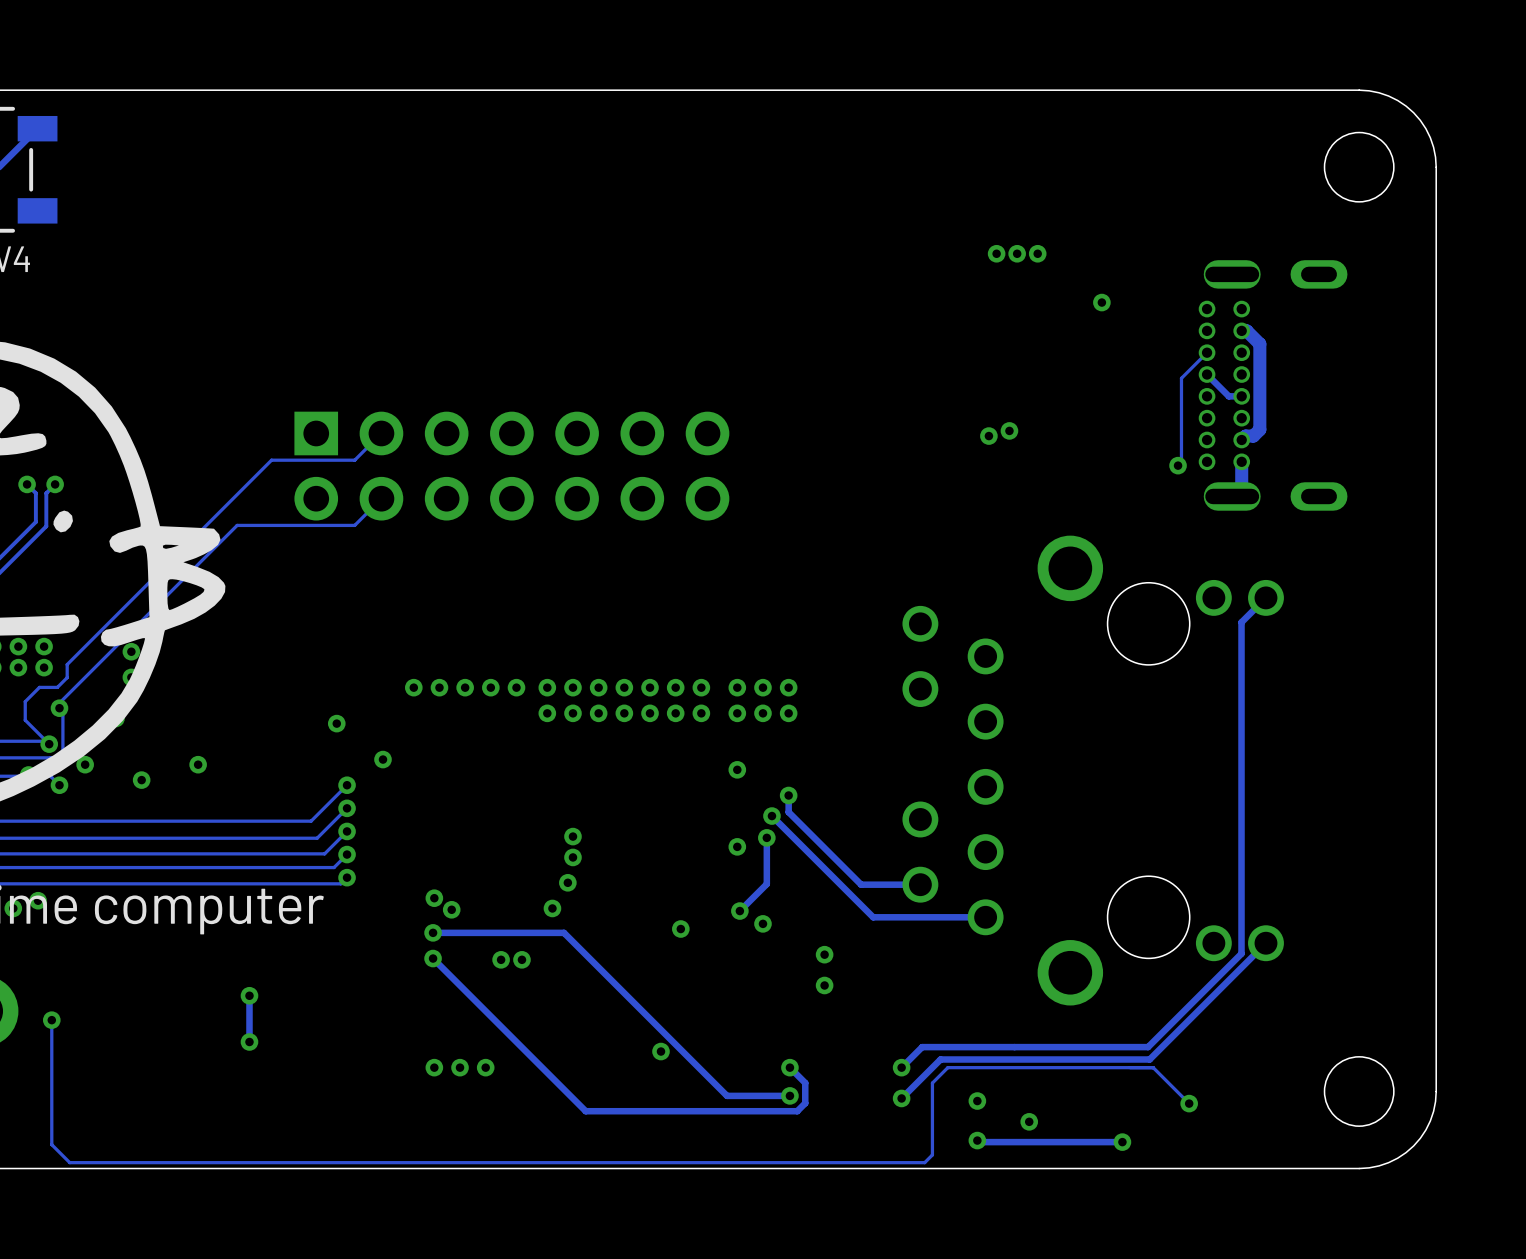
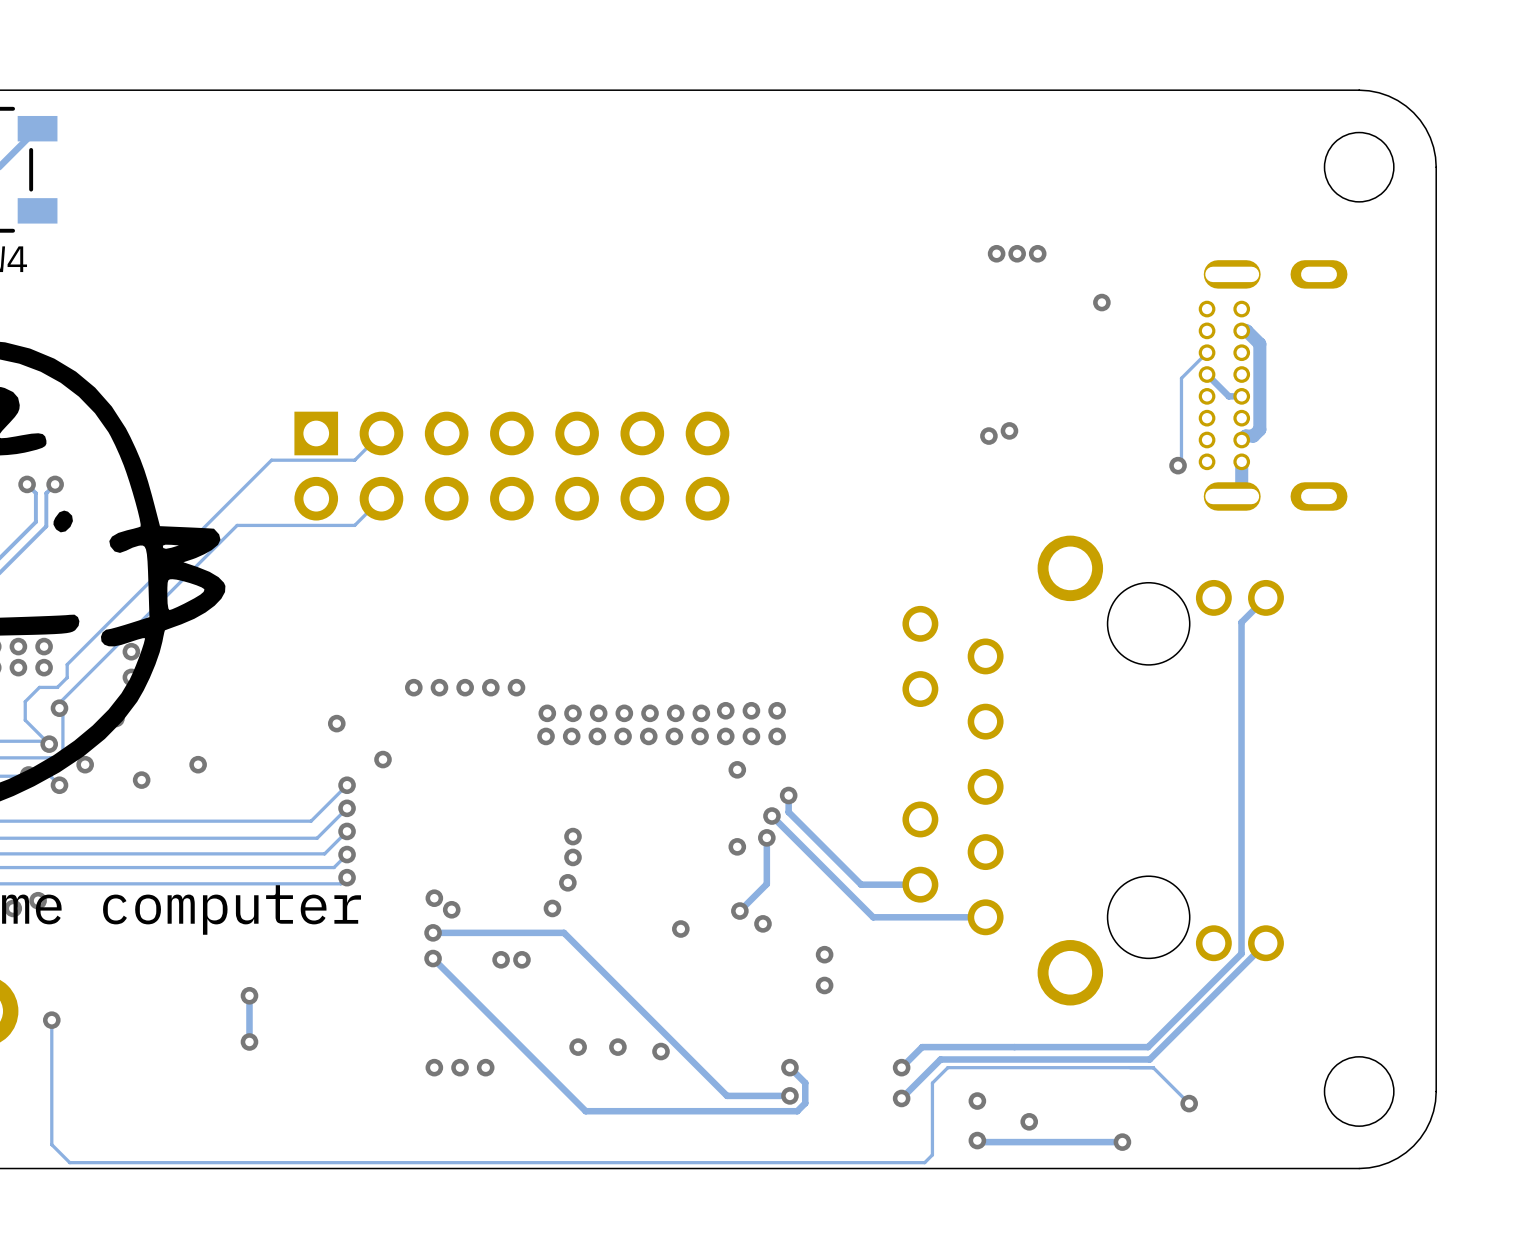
via: (547, 687) -> none
via: (572, 687) -> none
via: (598, 687) -> none
via: (624, 687) -> none
via: (650, 687) -> none
via: (675, 687) -> none
via: (701, 687) -> none
via: (737, 687) -> none
via: (762, 687) -> none
via: (788, 687) -> none
via: none -> (725, 710)
via: none -> (751, 710)
via: none -> (777, 710)
via: (737, 713) -> none
via: (762, 713) -> none
via: (788, 713) -> none
via: none -> (546, 736)
via: none -> (571, 736)
via: none -> (597, 736)
via: none -> (623, 736)
via: none -> (648, 736)
via: none -> (674, 736)
via: none -> (700, 736)
via: none -> (725, 736)
via: none -> (751, 736)
via: none -> (777, 736)
via: none -> (578, 1047)
via: none -> (617, 1047)

